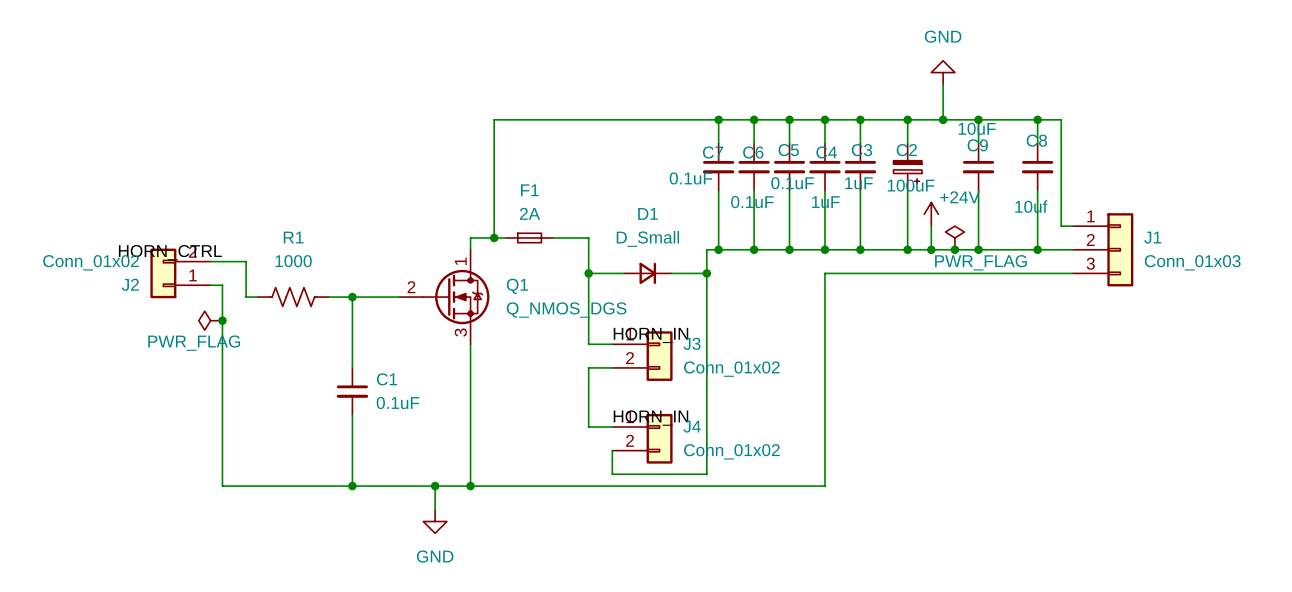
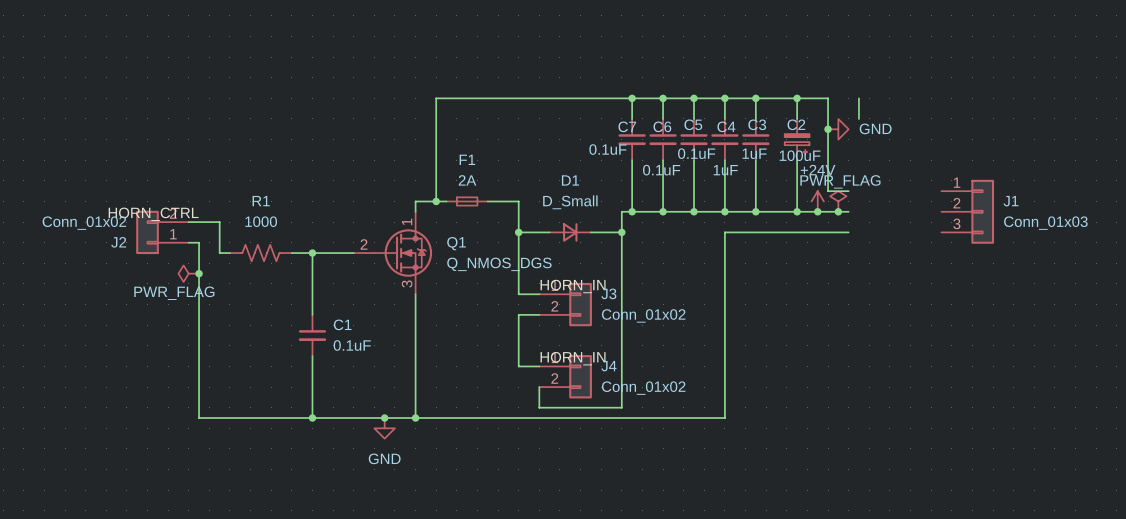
power symbol rotation: 0° (943, 72) -> 90° clockwise (838, 129)
power symbol position: GND (943, 72) -> GND (838, 129)
wire: (943, 84) (943, 119) (1061, 119) (1061, 226) (1073, 226) -> none
wire: none -> (828, 98) (828, 191) (848, 191)
junction: (943, 119) -> none
junction: (978, 119) -> none
wire: (1037, 119) (1037, 143) -> none
junction: (1037, 119) -> none
junction: none -> (828, 129)
C9: 10uF (978, 167) -> none
C8: 10uf (1037, 167) -> none
wire: (978, 190) (978, 249) -> none
wire: (1037, 190) (1037, 249) -> none
power symbol text position: +24V (960, 197) -> +24V (818, 170)
power symbol position: +24V (931, 214) -> +24V (817, 201)
wire: (966, 249) (1073, 249) -> none
junction: (978, 249) -> none
junction: (1037, 249) -> none
power symbol text position: PWR_FLAG (980, 262) -> PWR_FLAG (840, 181)
wire: (966, 273) (1073, 273) -> none
power symbol position: GND (435, 521) -> GND (384, 428)

